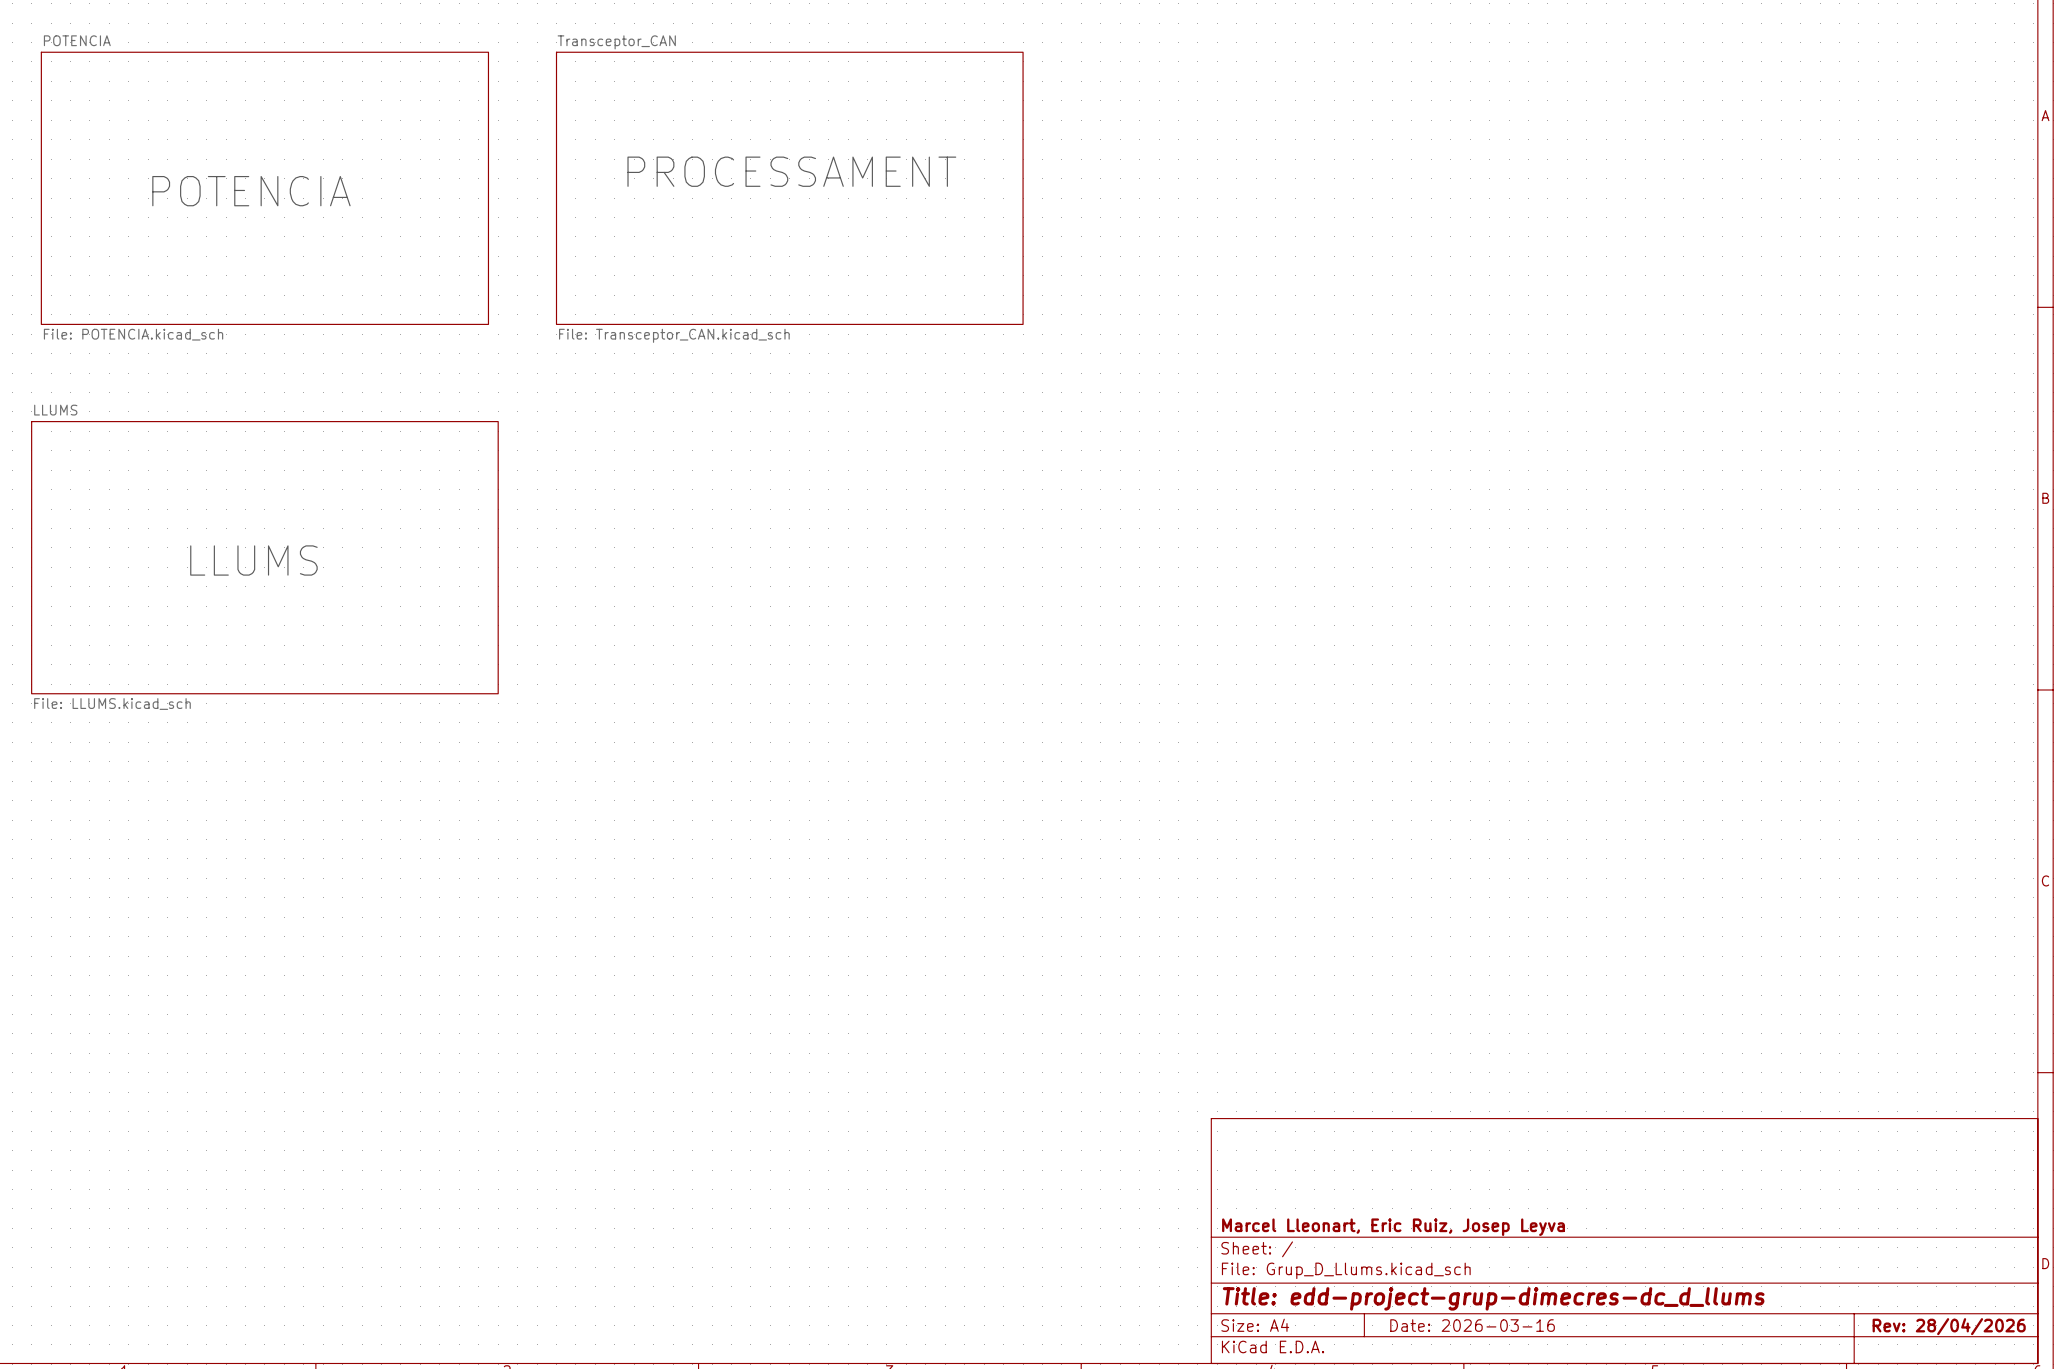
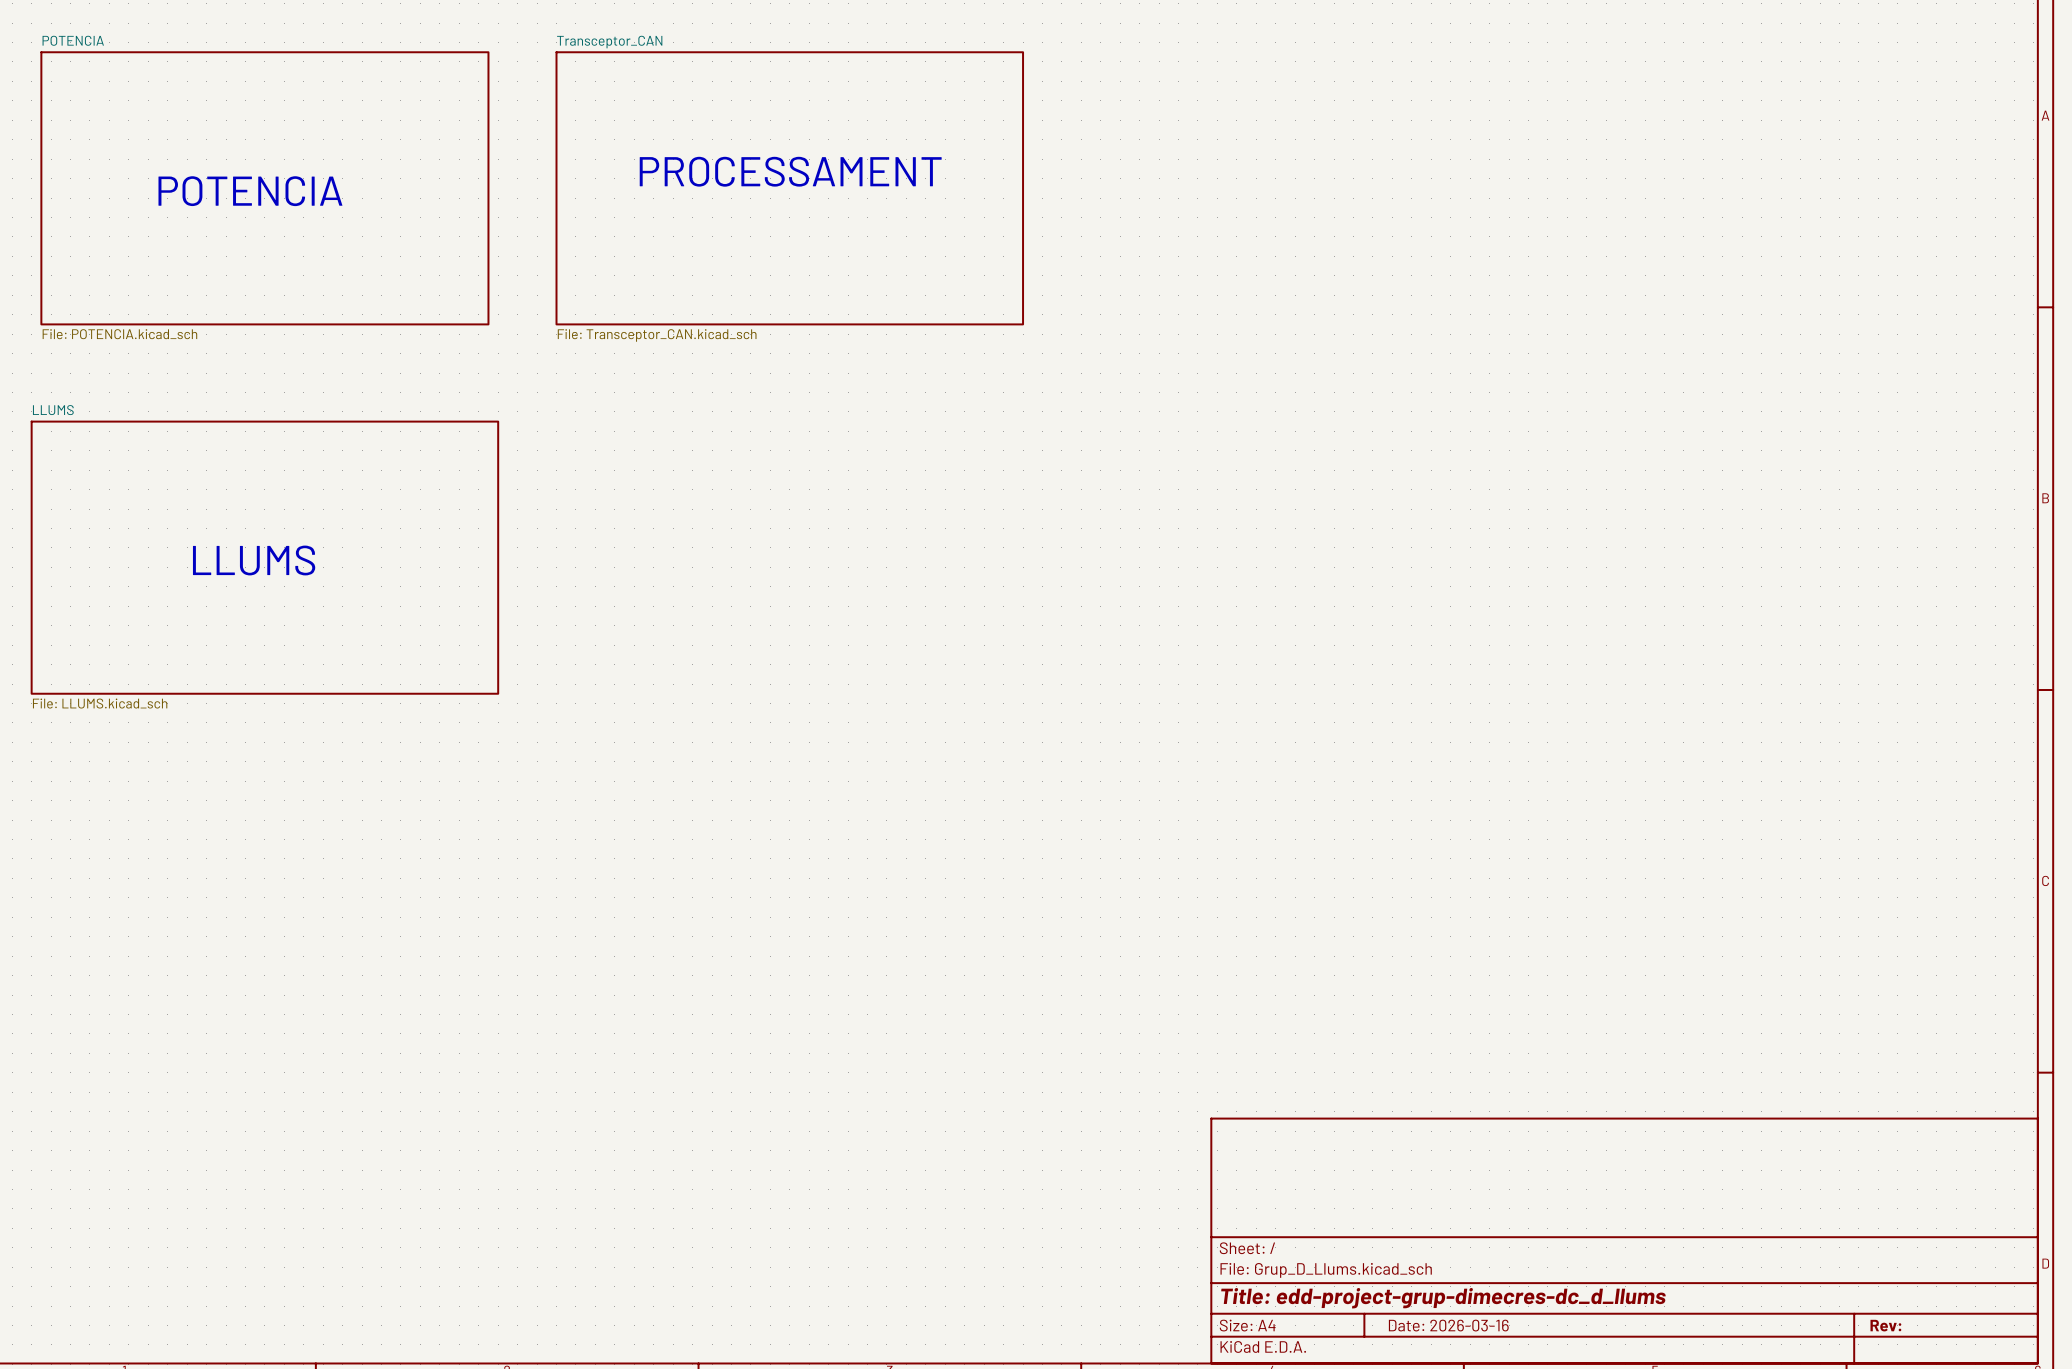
title block: Marcel Lleonart, Eric Ruiz, Josep Leyva (1393, 1227) -> none
title block: Rev: 28/04/2026 (1949, 1326) -> Rev: (1885, 1325)

